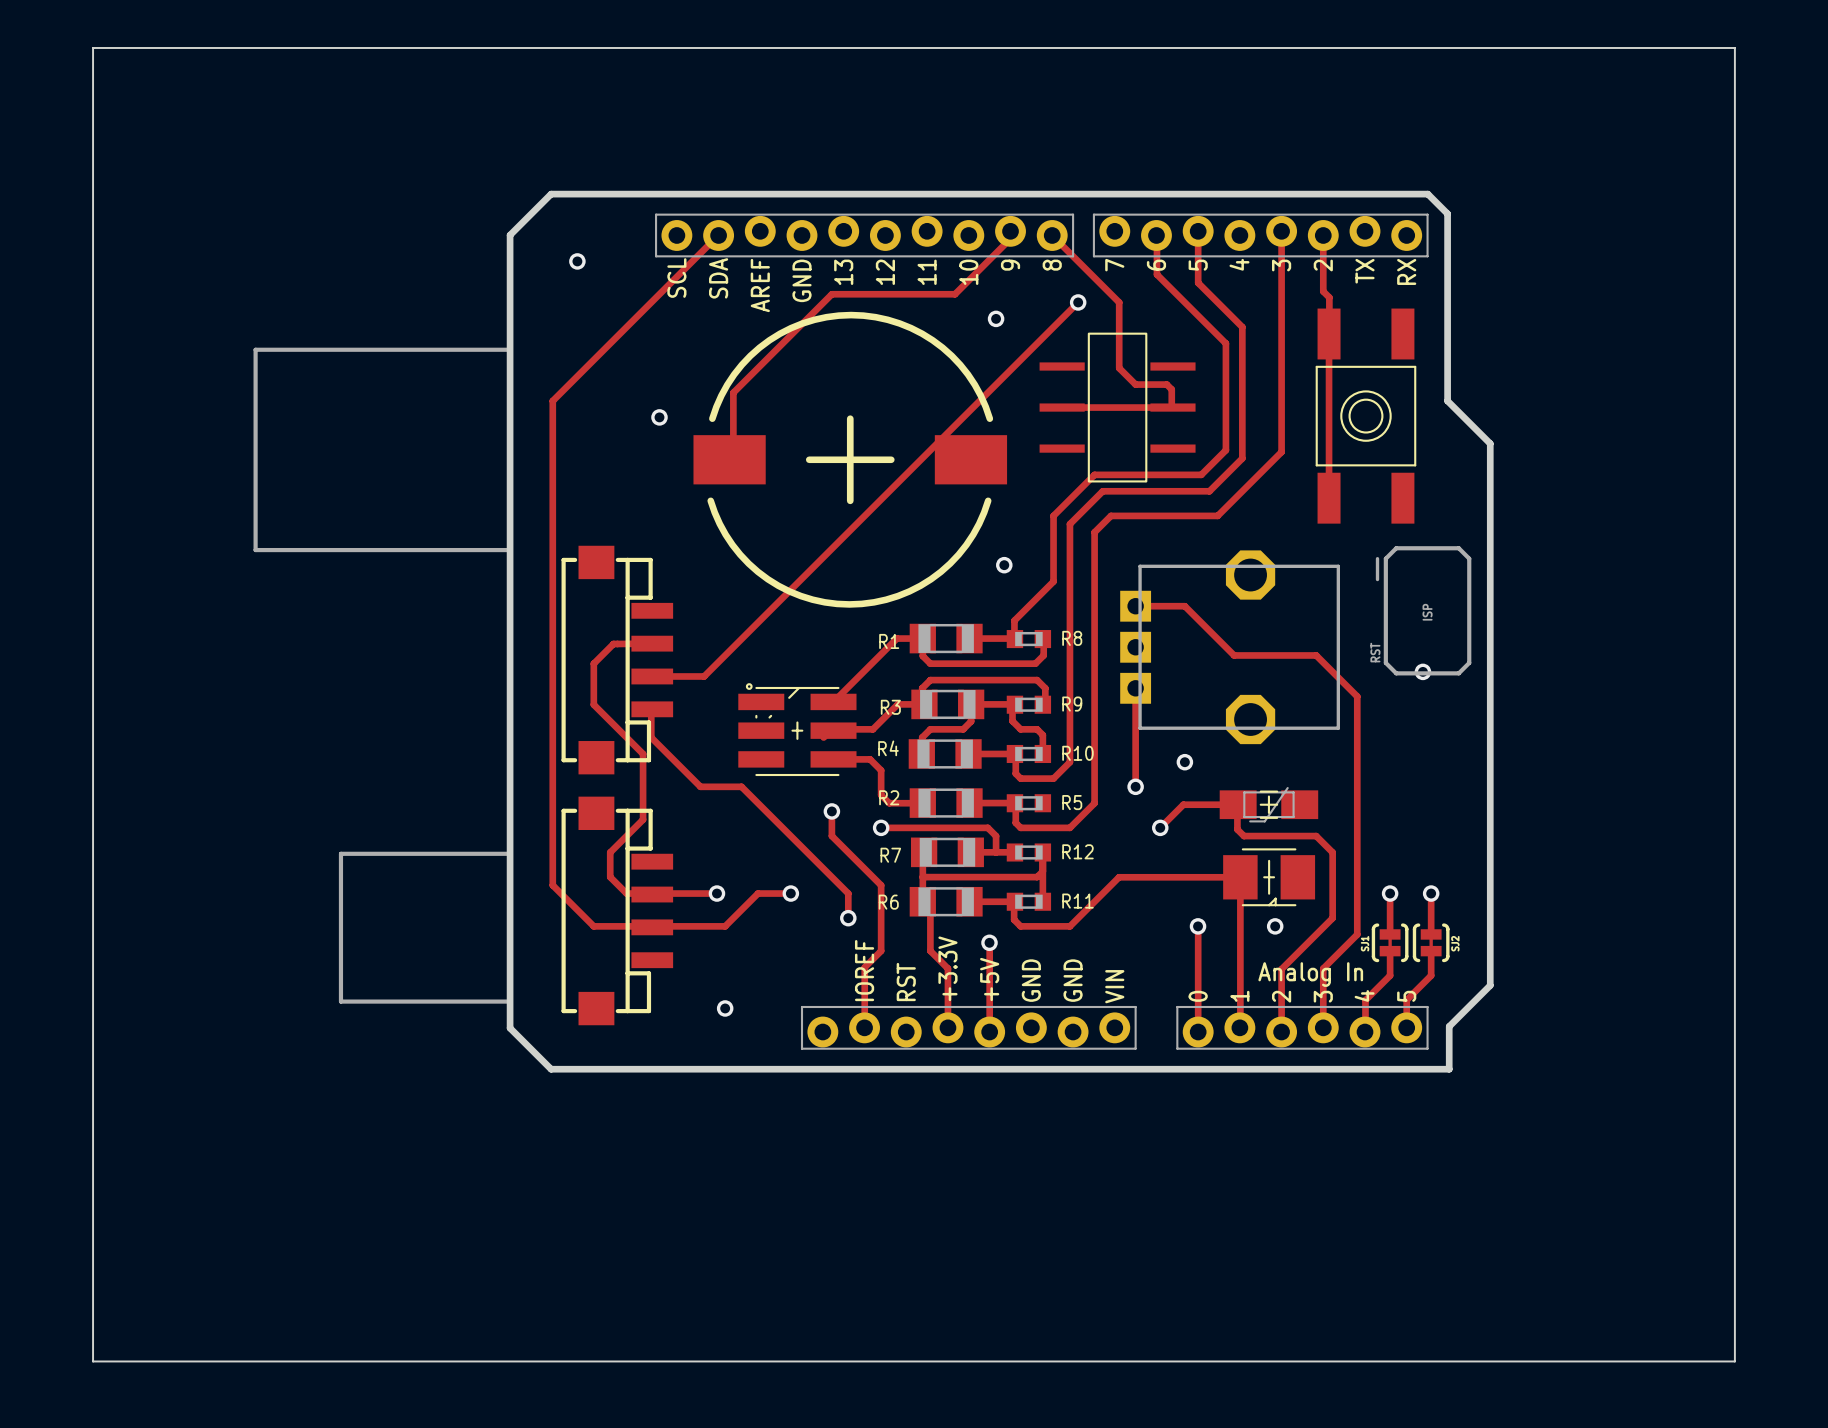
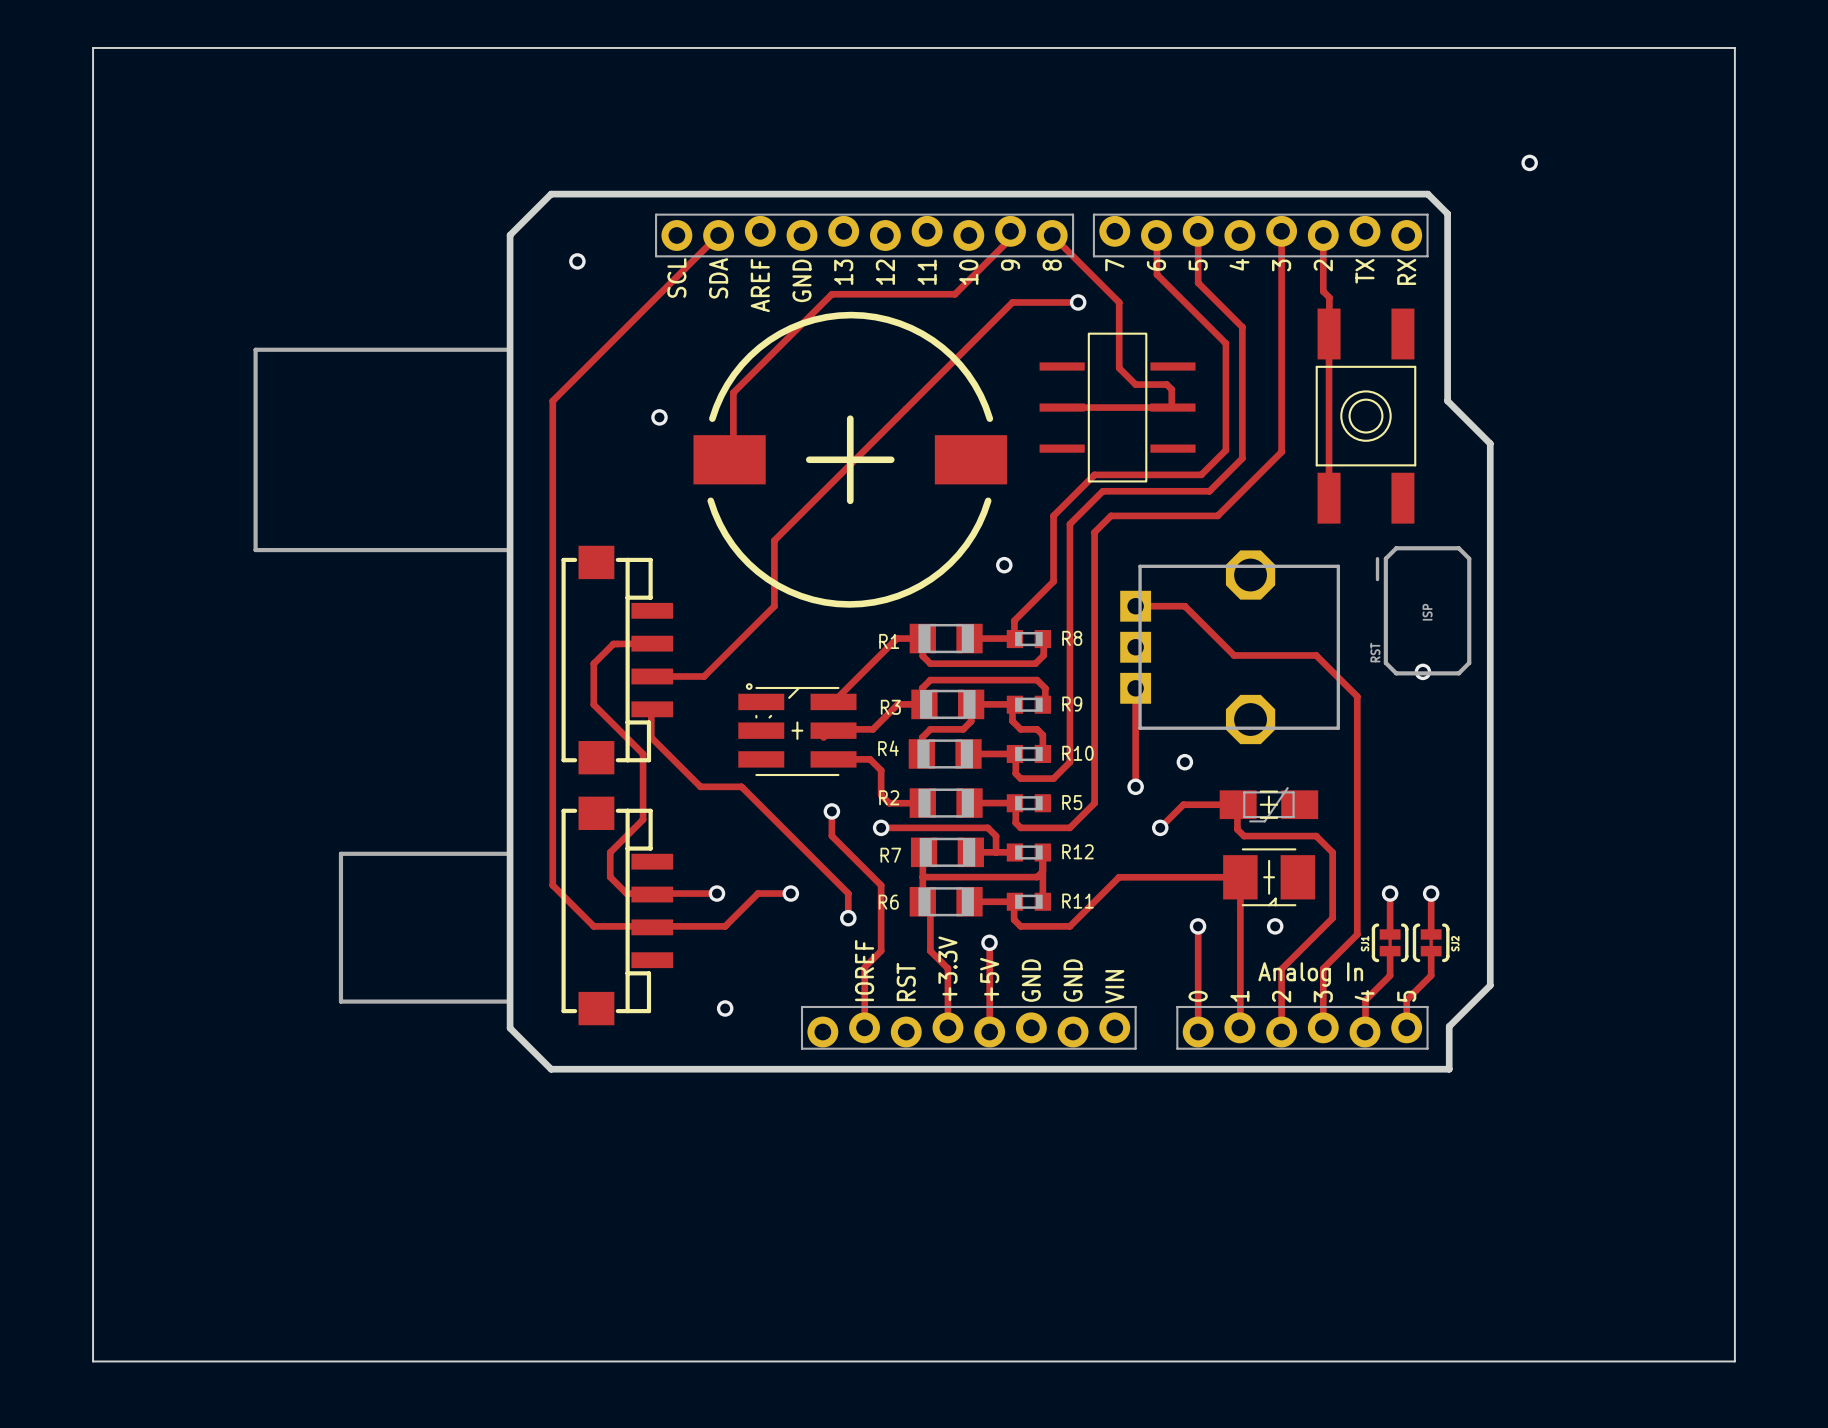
via: none -> (1529, 162)
track: (1078, 302) (774, 606) -> (1078, 302) (1012, 302) (774, 540) (774, 606)
via: (996, 318) -> none

